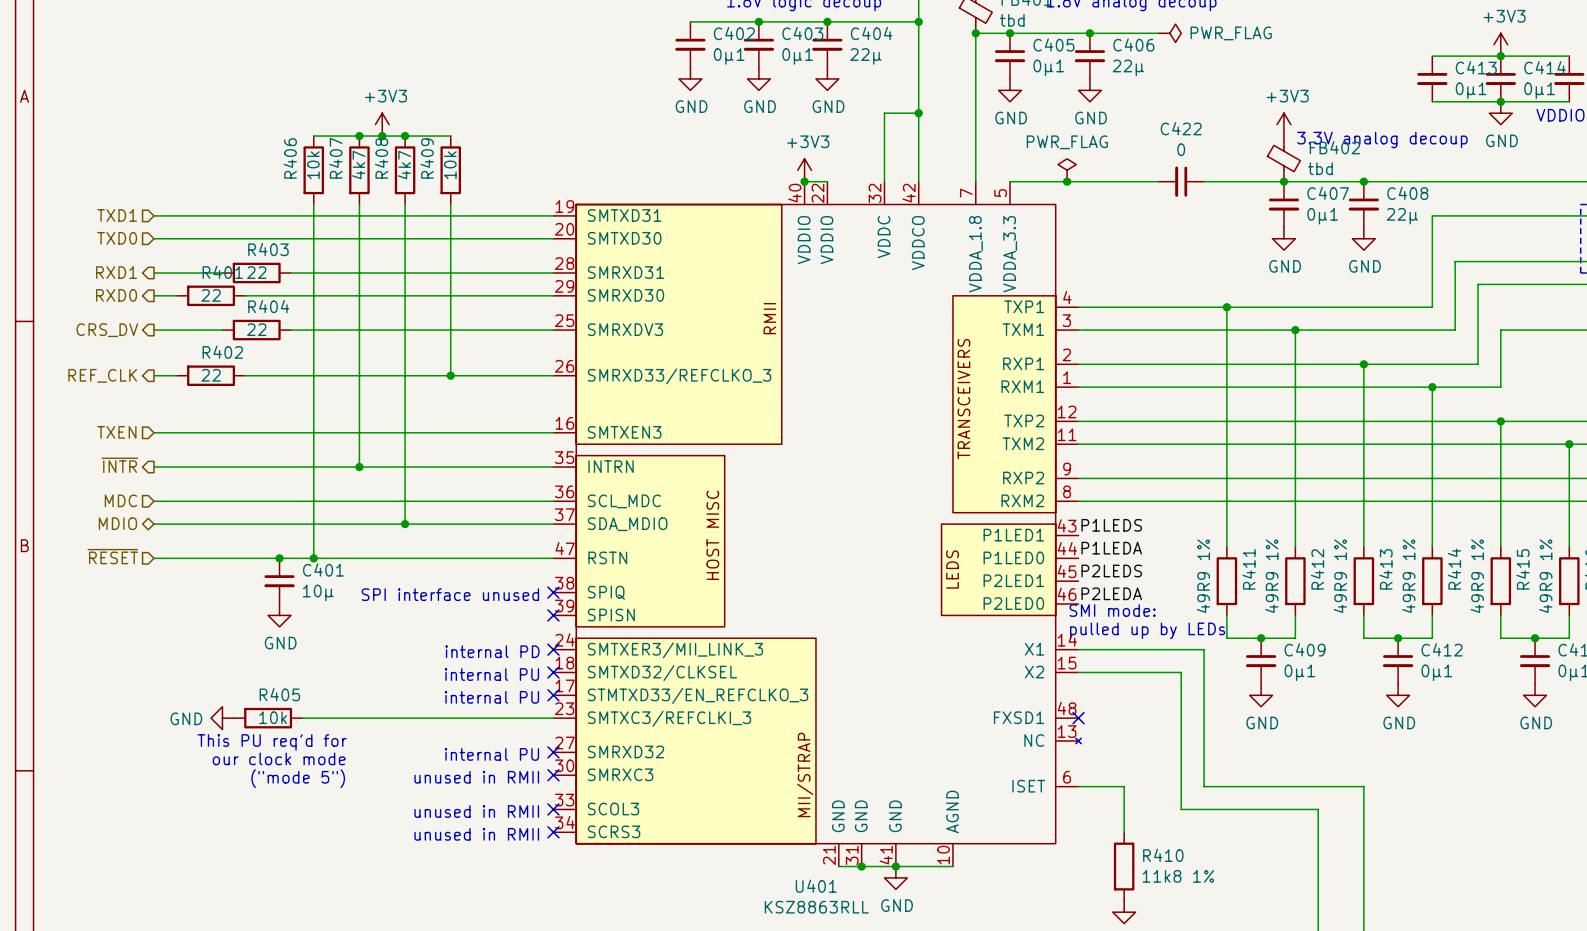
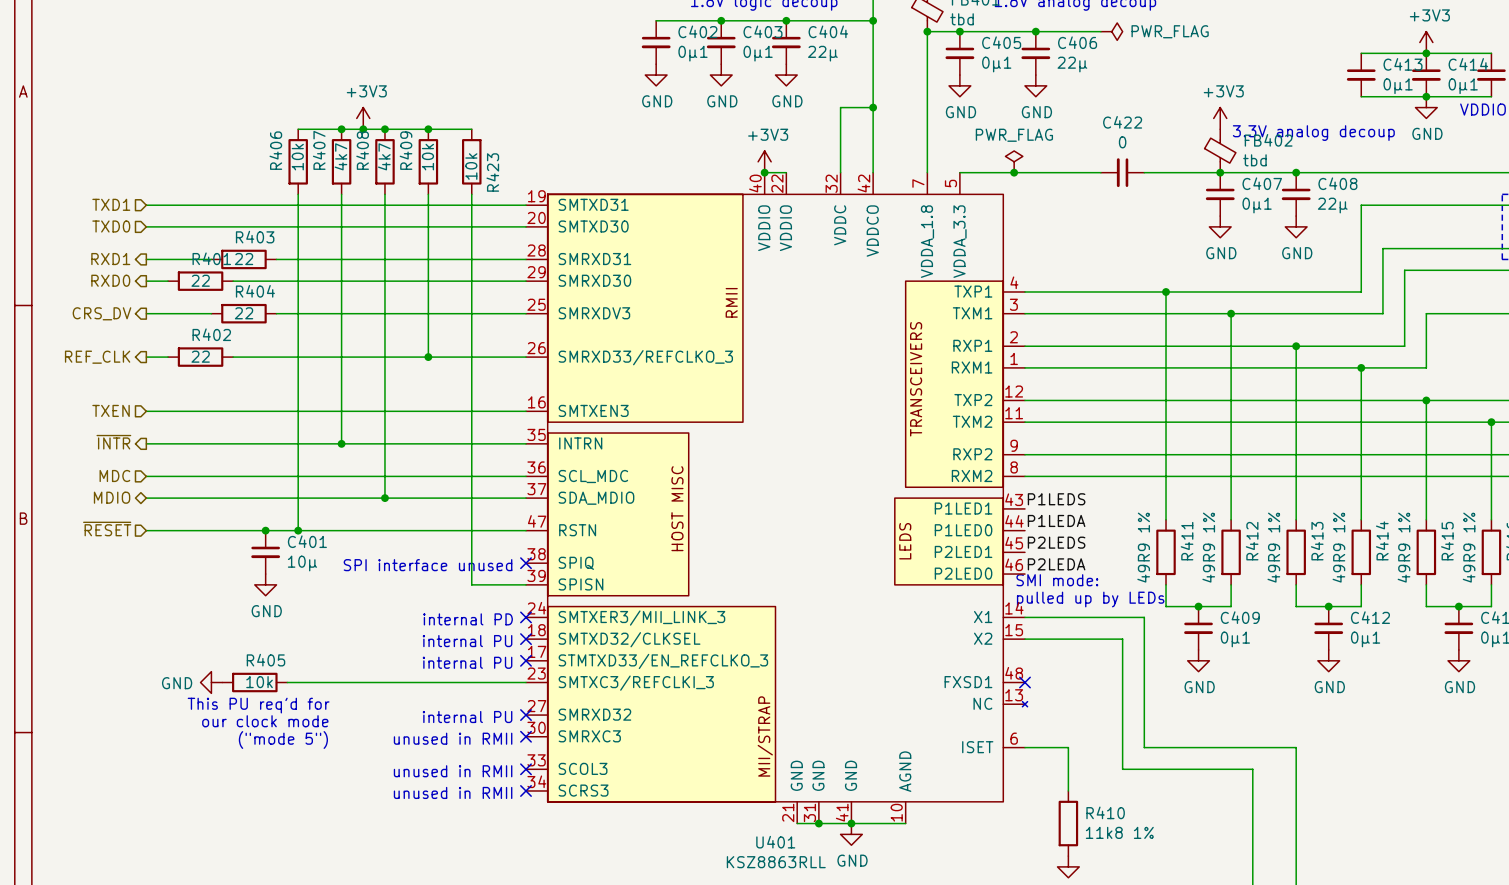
wire: none -> (428, 129) (471, 129)
junction: none -> (428, 129)
R423: none -> 10k (471, 161)
wire: none -> (471, 194) (471, 584) (526, 584)
no-connect mark: (553, 615) -> none

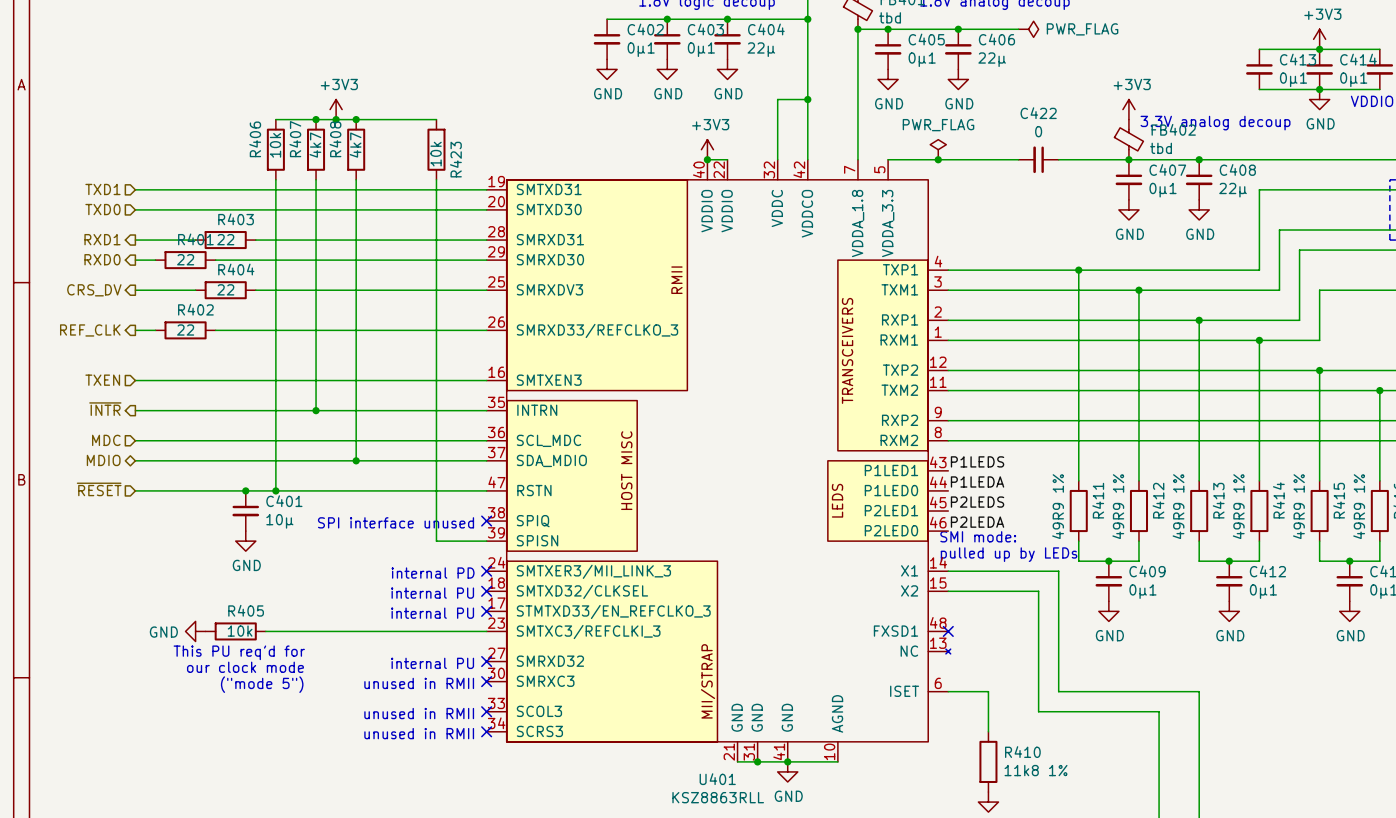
junction: (428, 129) -> none
R409: 10k (428, 161) -> none
wire: (428, 194) (428, 357) -> none
junction: (428, 357) -> none

